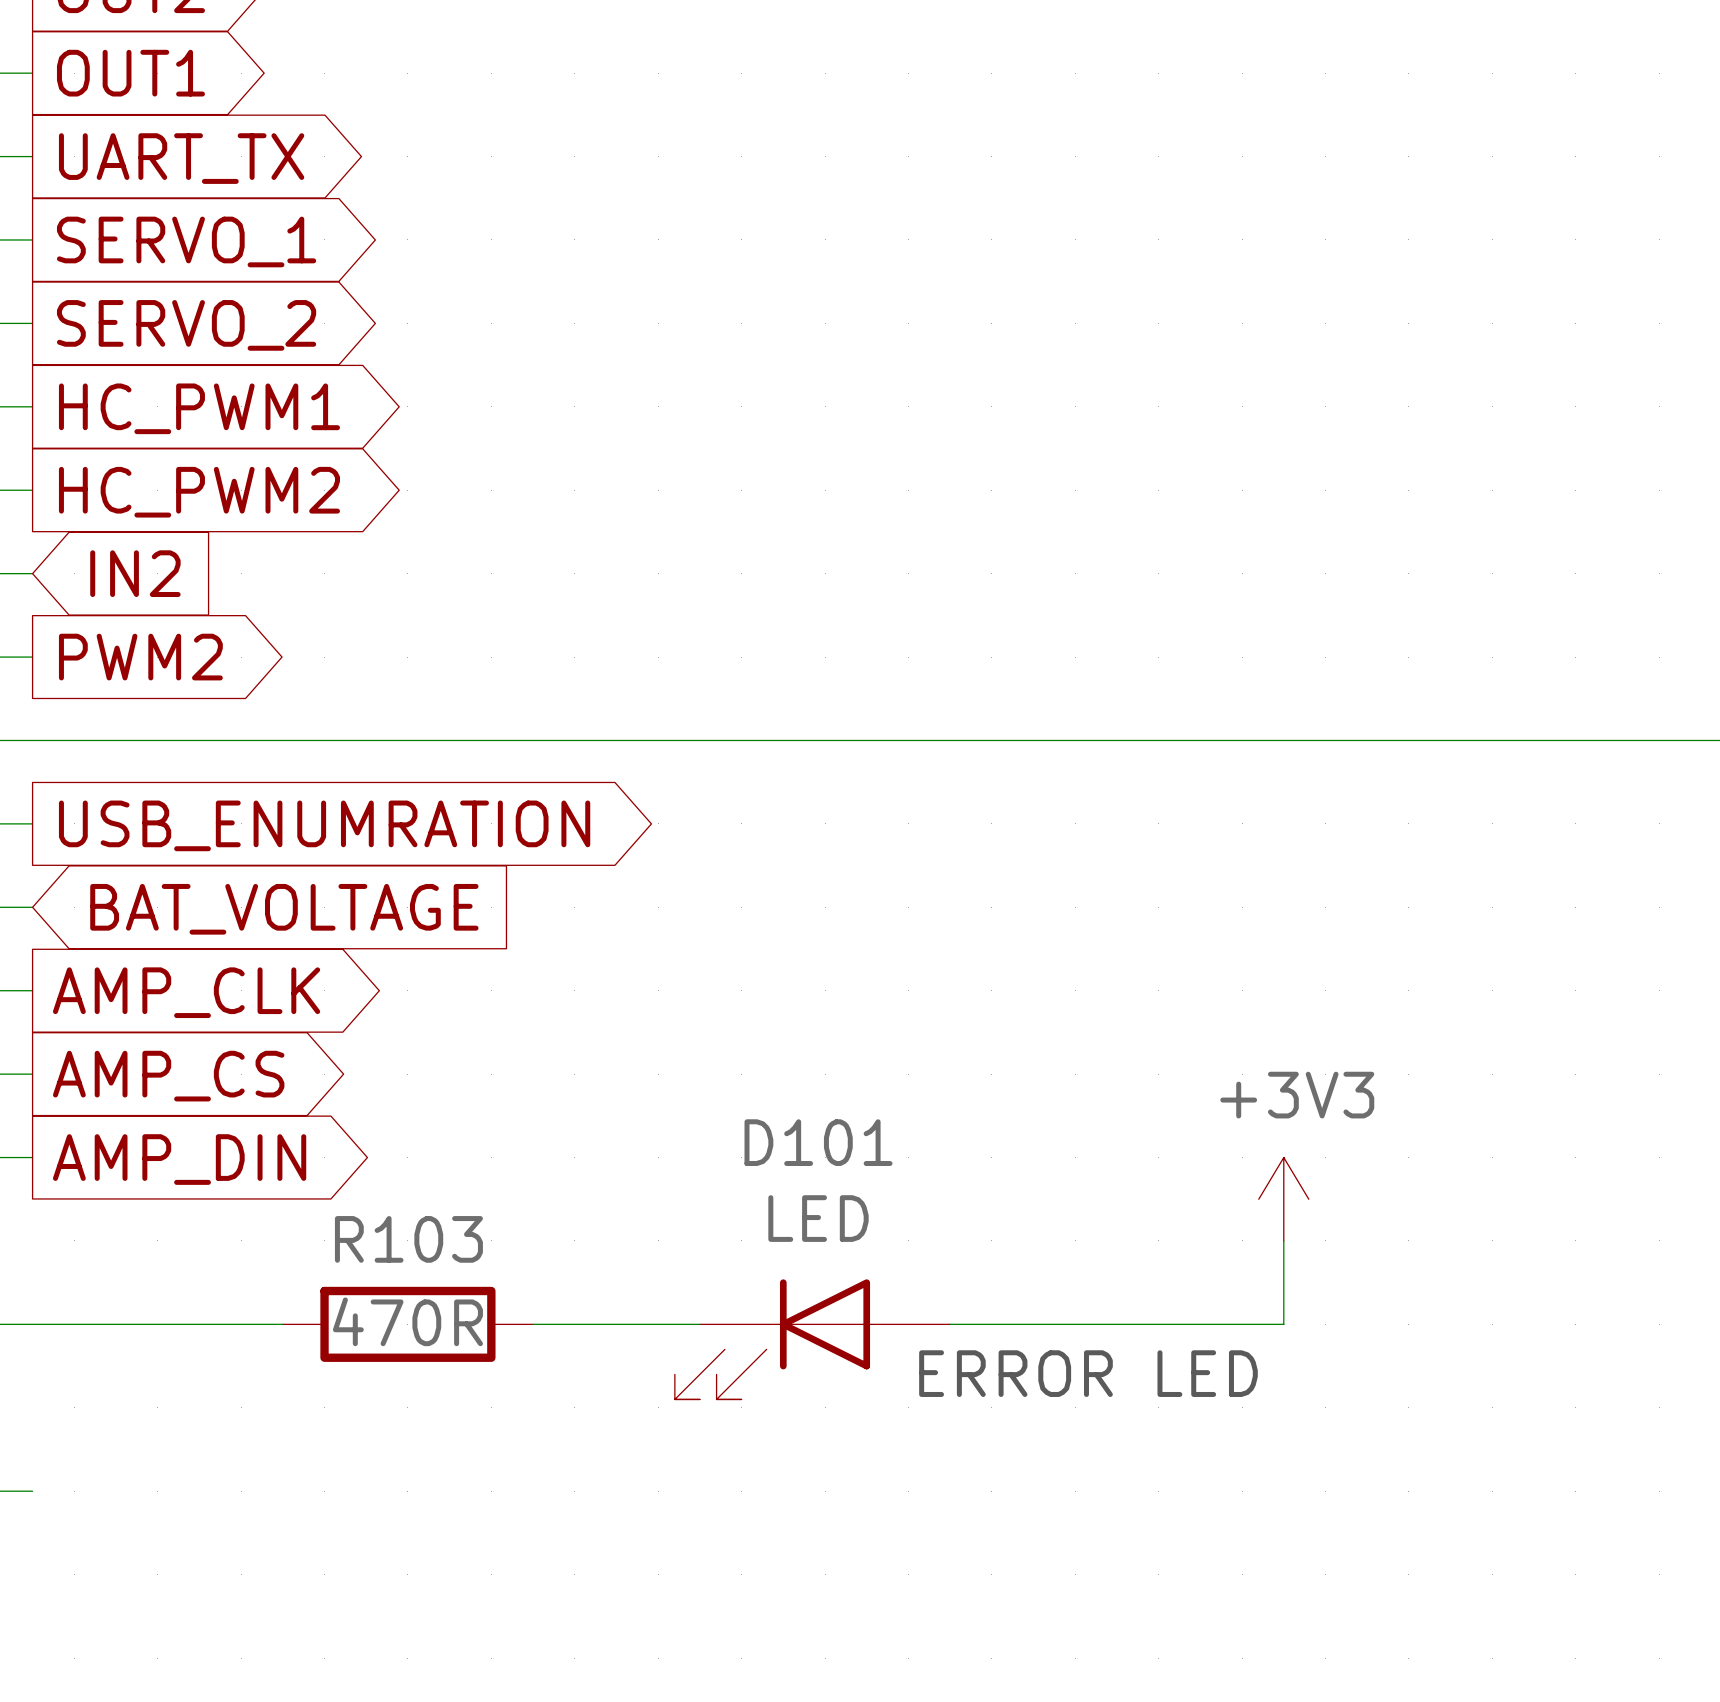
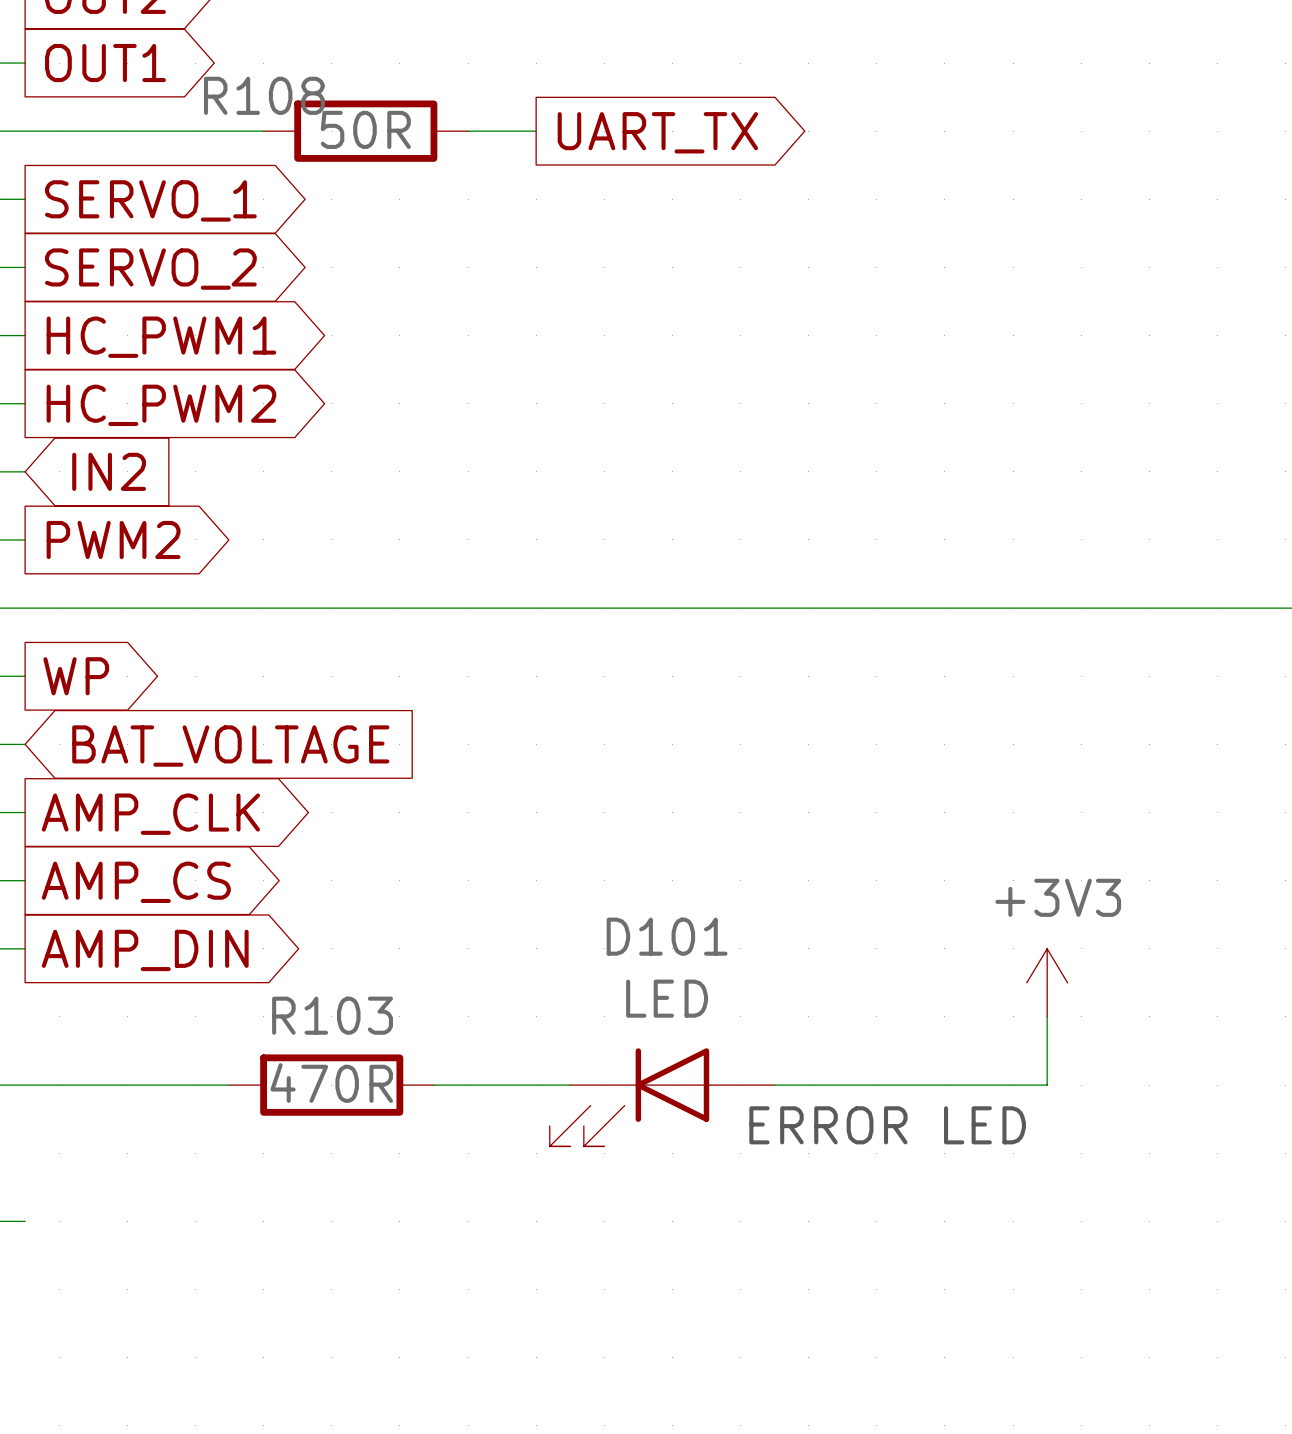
wire: none -> (25, 131) (263, 131)
R108: none -> 50R (365, 131)
wire: none -> (468, 131) (536, 131)
global label position: UART_TX (181, 158) -> UART_TX (657, 132)
global label: USB_ENUMRATION (324, 825) -> WP (76, 676)

